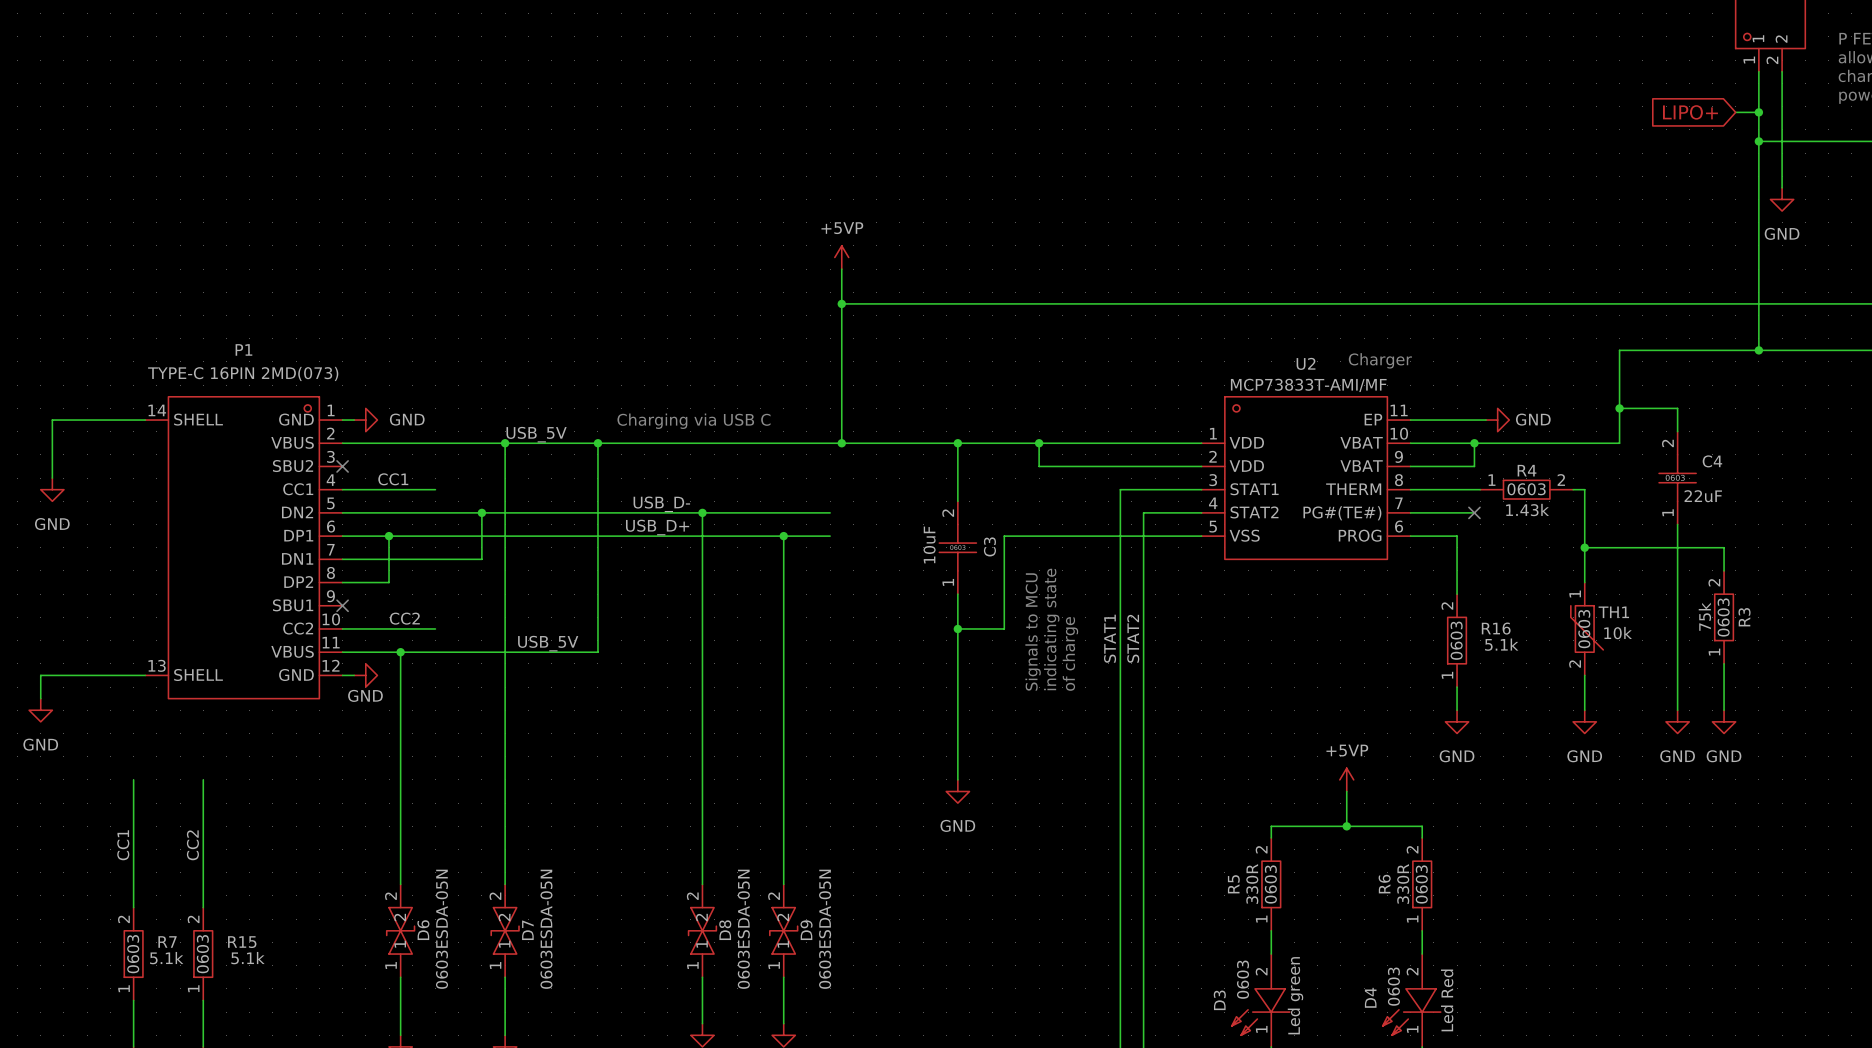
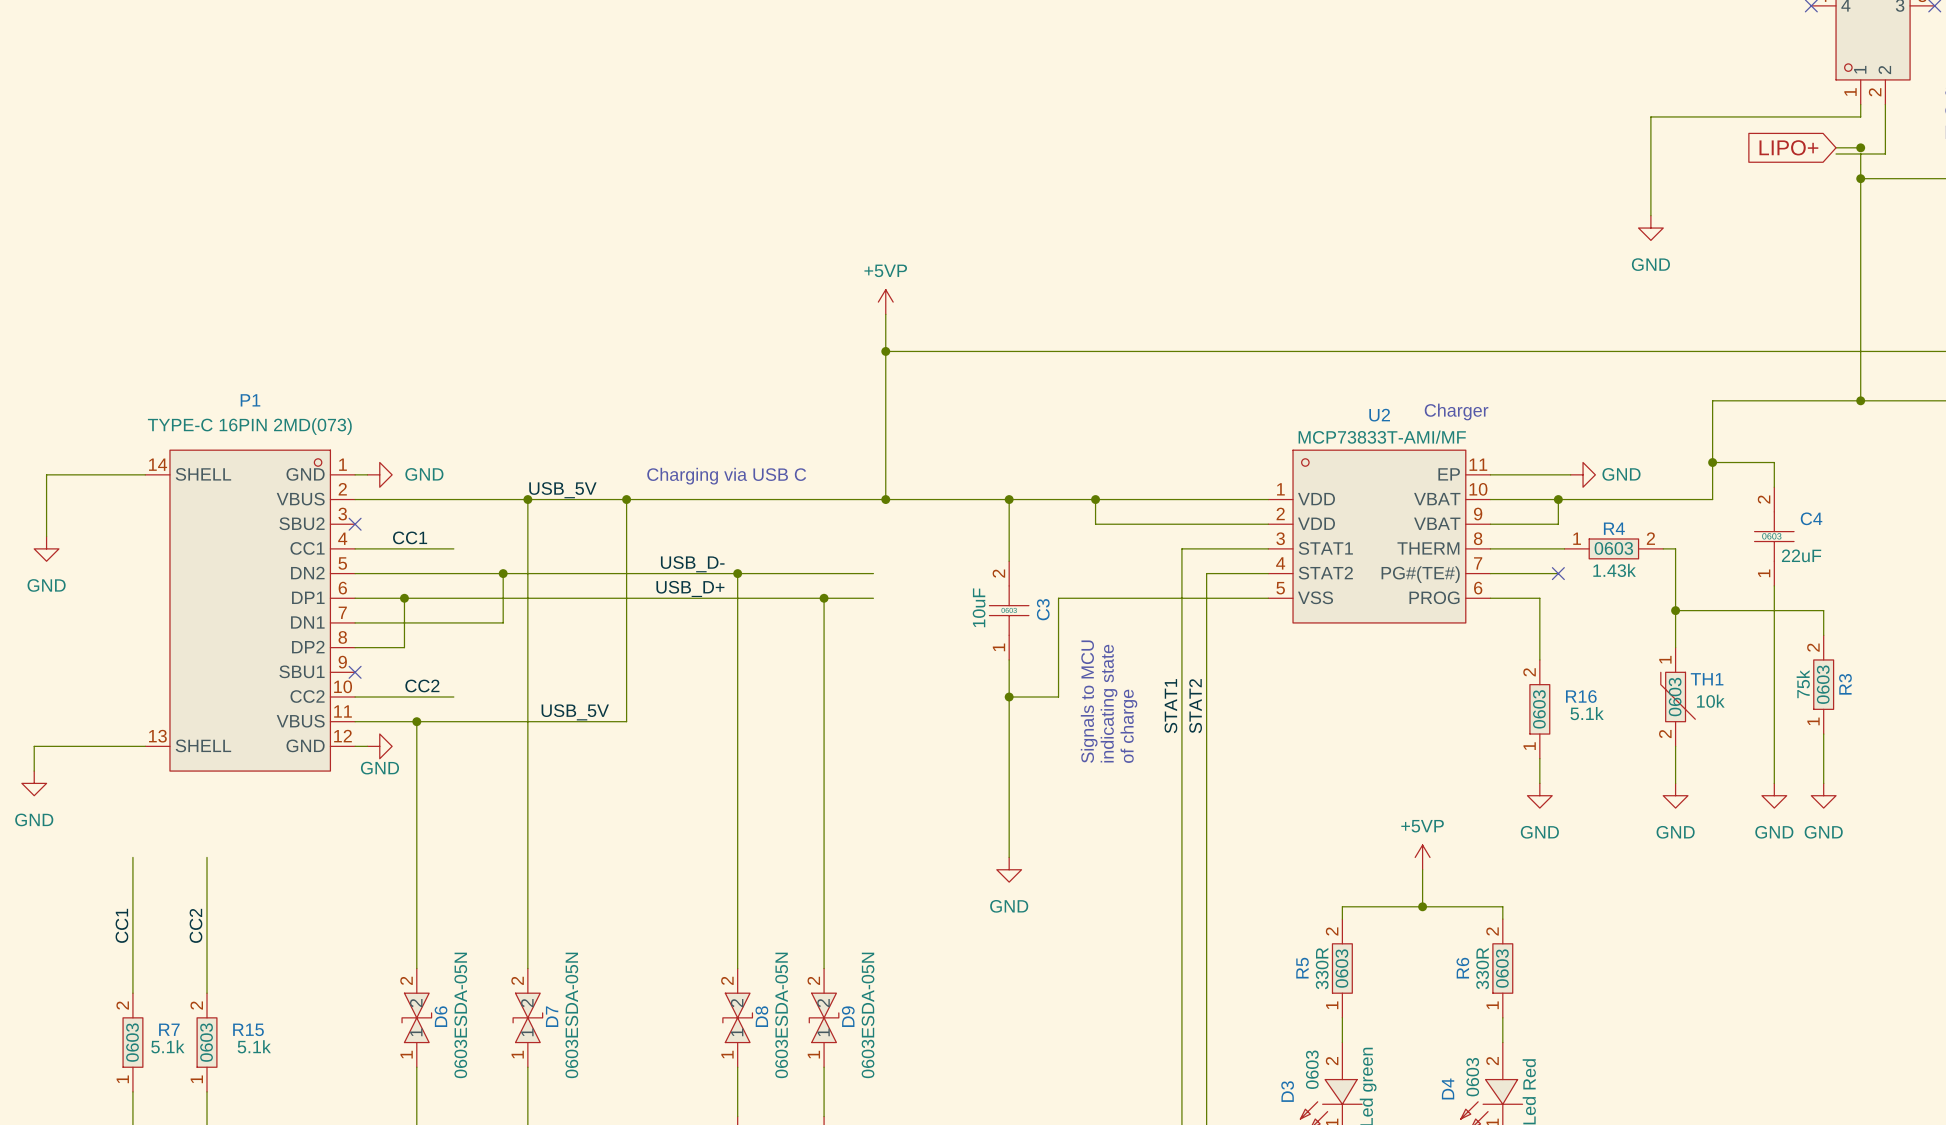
wire: (1758, 83) (1758, 118) -> (1860, 116) (1650, 116) (1650, 215)
wire: (1782, 118) (1782, 187) -> (1885, 153) (1836, 153)
power symbol position: GND (1782, 199) -> GND (1650, 228)

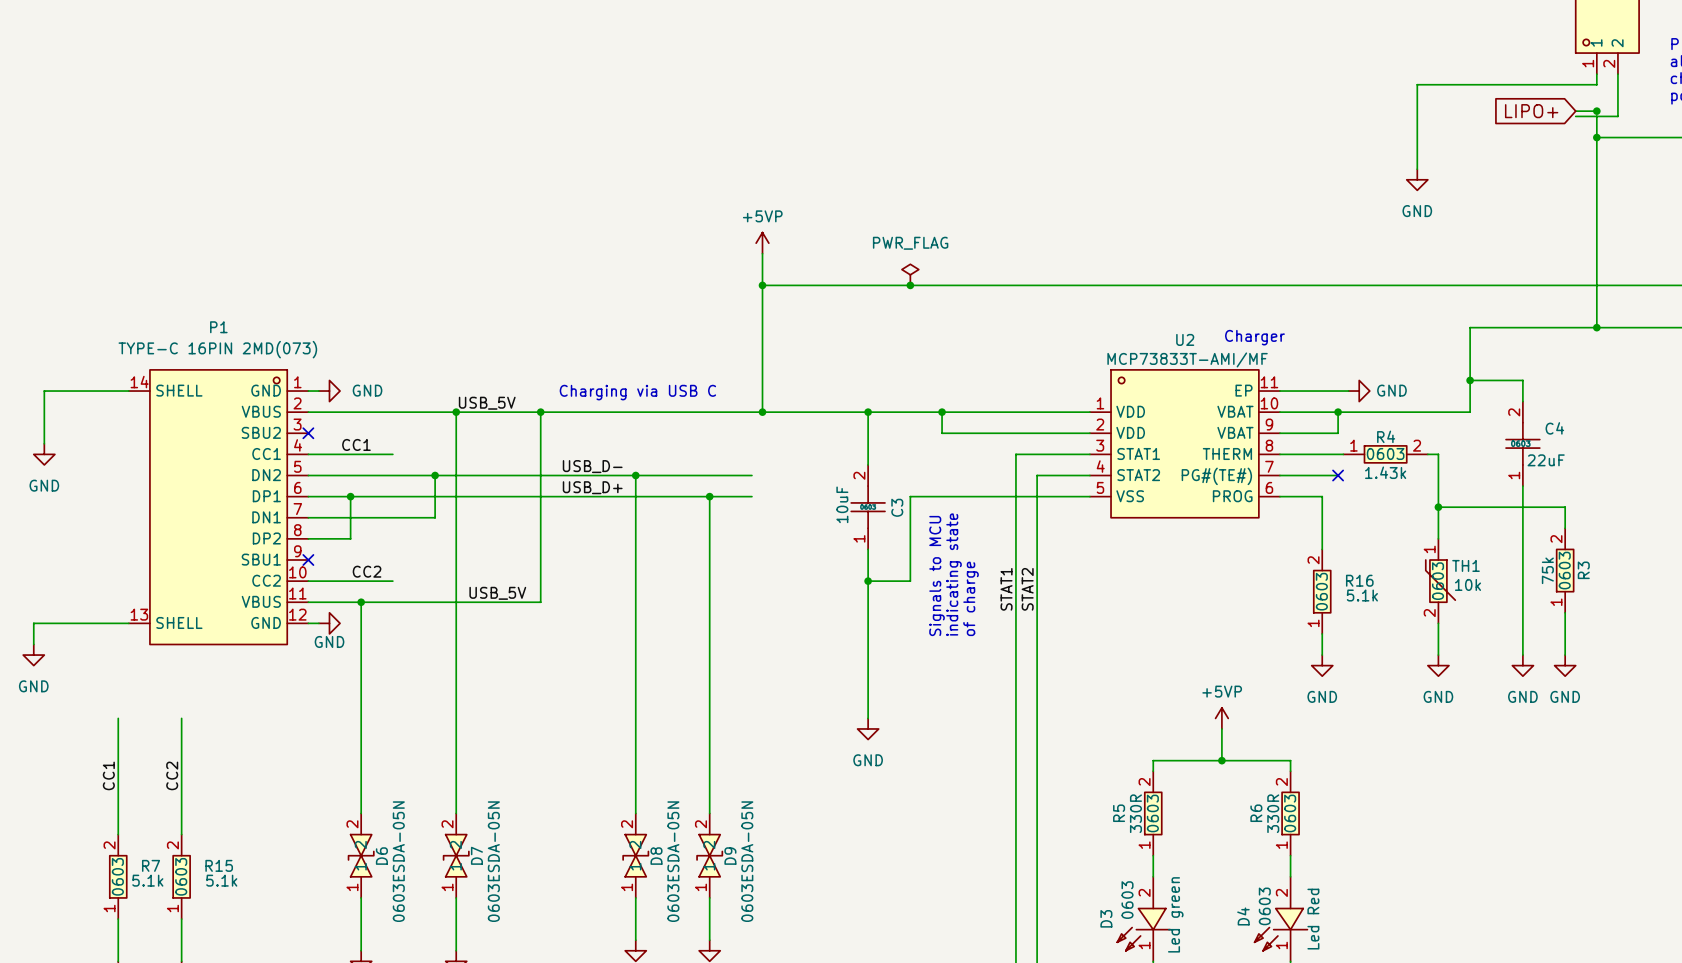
power symbol: none -> PWR_FLAG (910, 274)
junction: none -> (910, 285)

